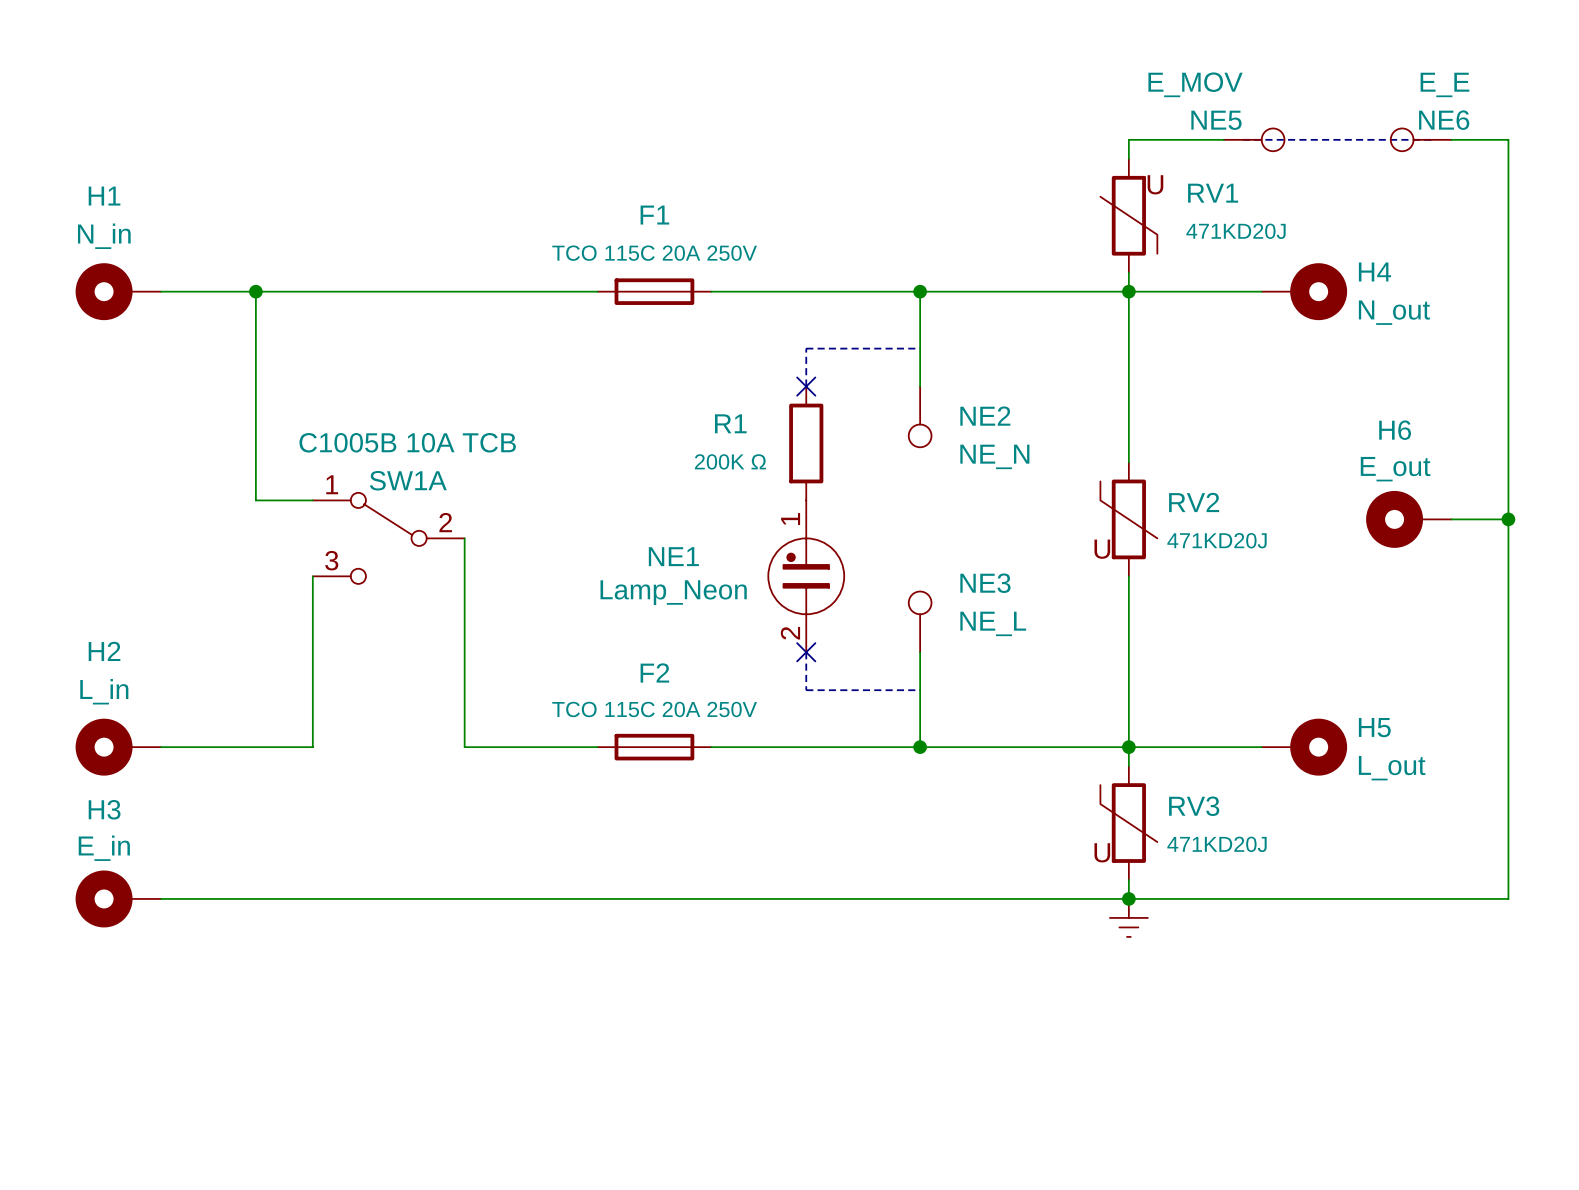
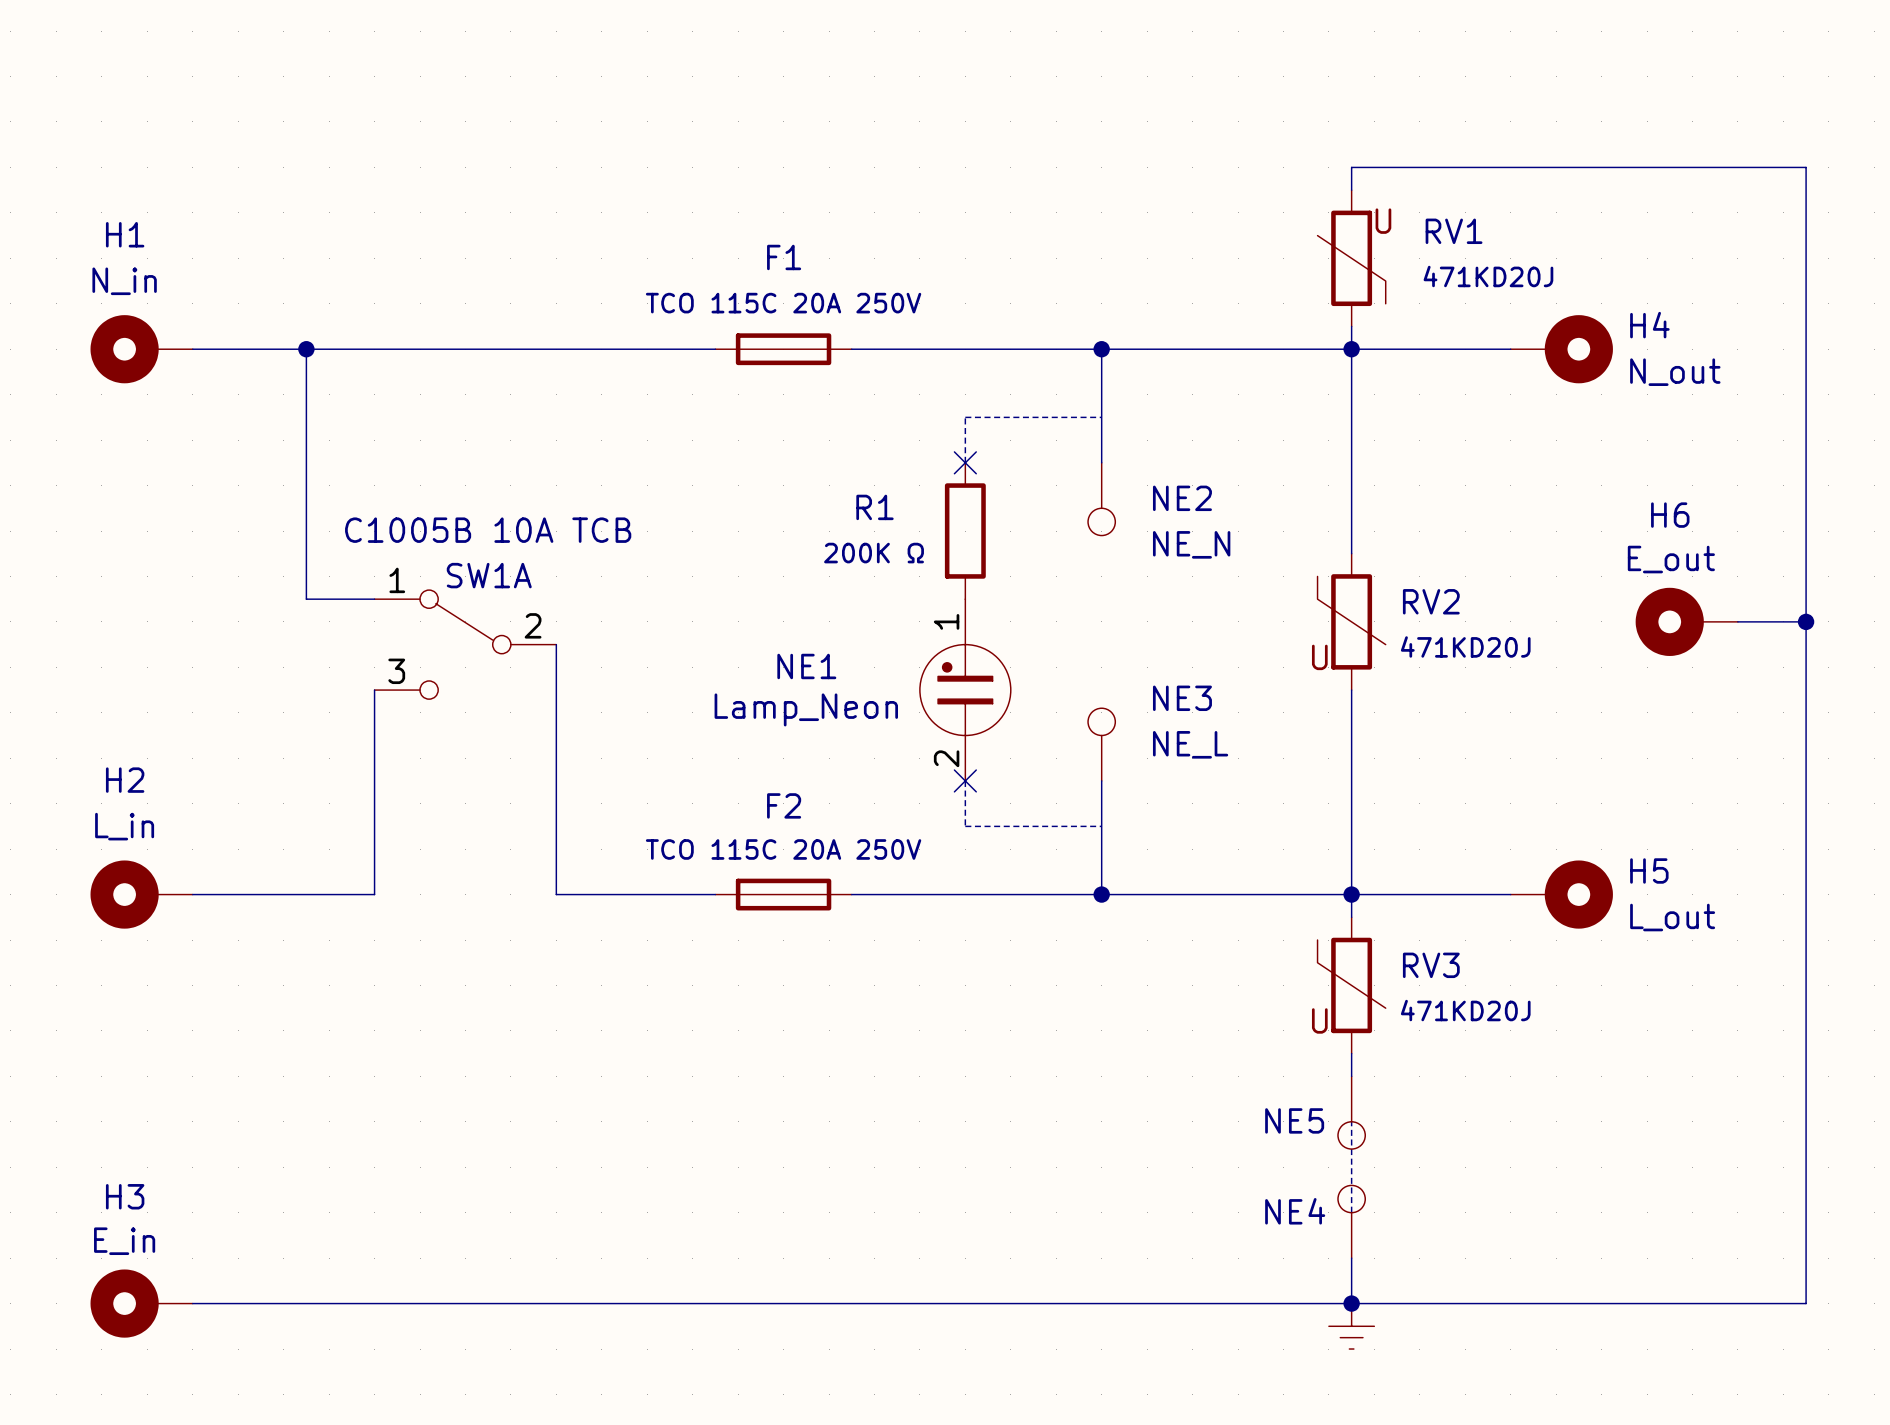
NE5 value: E_MOV (1195, 84) -> none
line: (1242, 139) (1432, 139) -> none
NE5 position: (1254, 139) -> (1351, 1112)
NE5 rotation: 0° (1273, 139) -> 90° clockwise (1351, 1135)
NE6: E_E (1421, 139) -> none
H3 position: (118, 898) -> (141, 1303)
wire: (161, 898) (1508, 898) -> (192, 1303) (1806, 1303) (1806, 1076)
junction: (1128, 898) -> none
power symbol position: (1128, 917) -> (1351, 1326)
line: none -> (1351, 1121) (1351, 1212)
NE4: none -> (1351, 1221)
wire: none -> (1351, 1258) (1351, 1303)
junction: none -> (1351, 1303)

